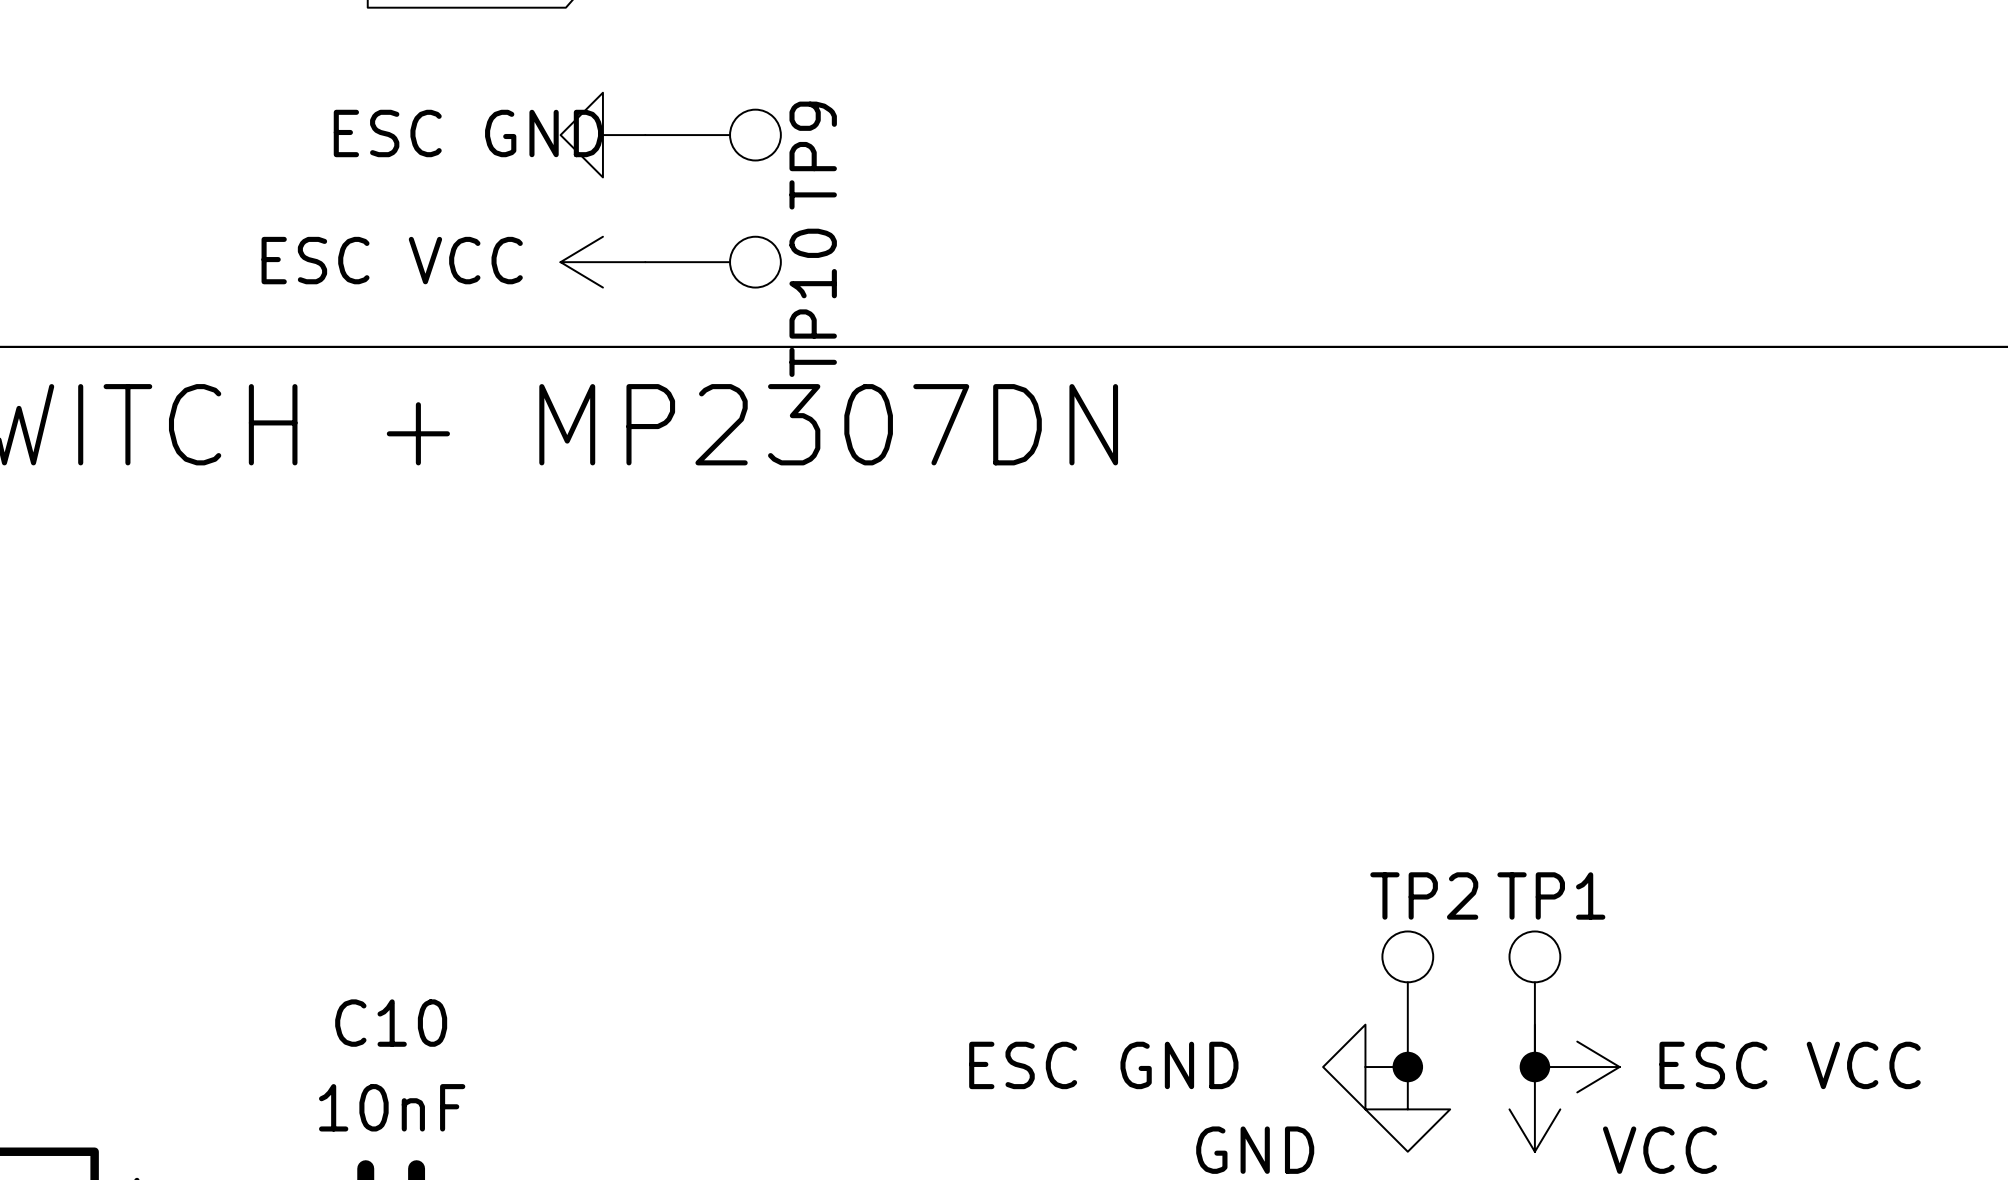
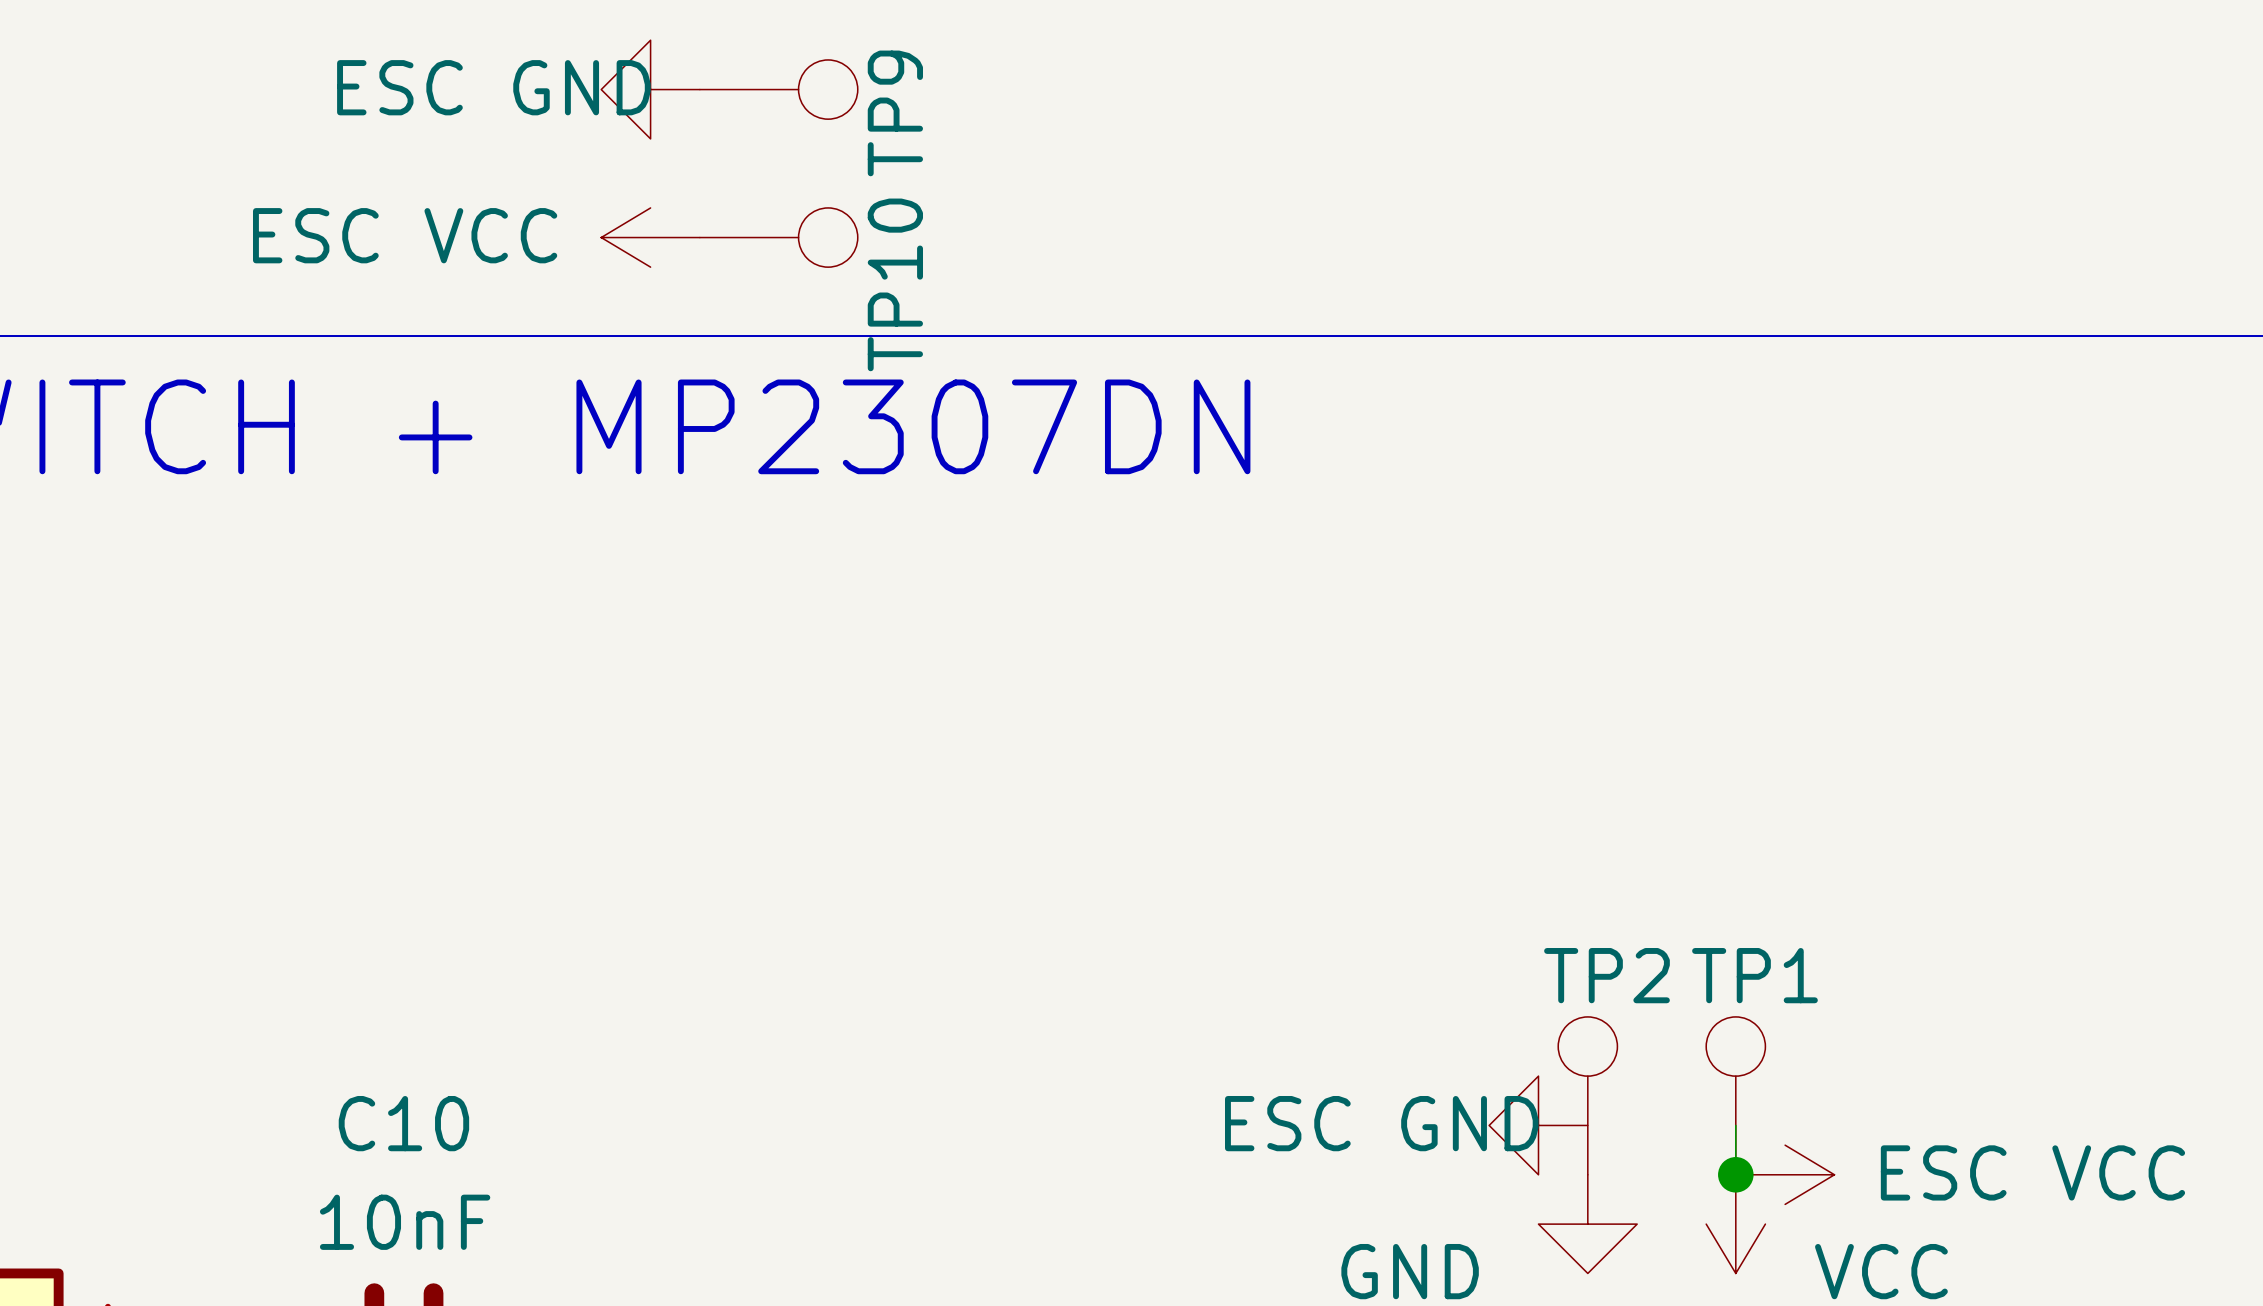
power symbol text position: ESC GND (1103, 1065) -> ESC GND (1381, 1123)
power symbol position: ESC GND (1365, 1067) -> ESC GND (1538, 1125)
junction: (1407, 1067) -> none

